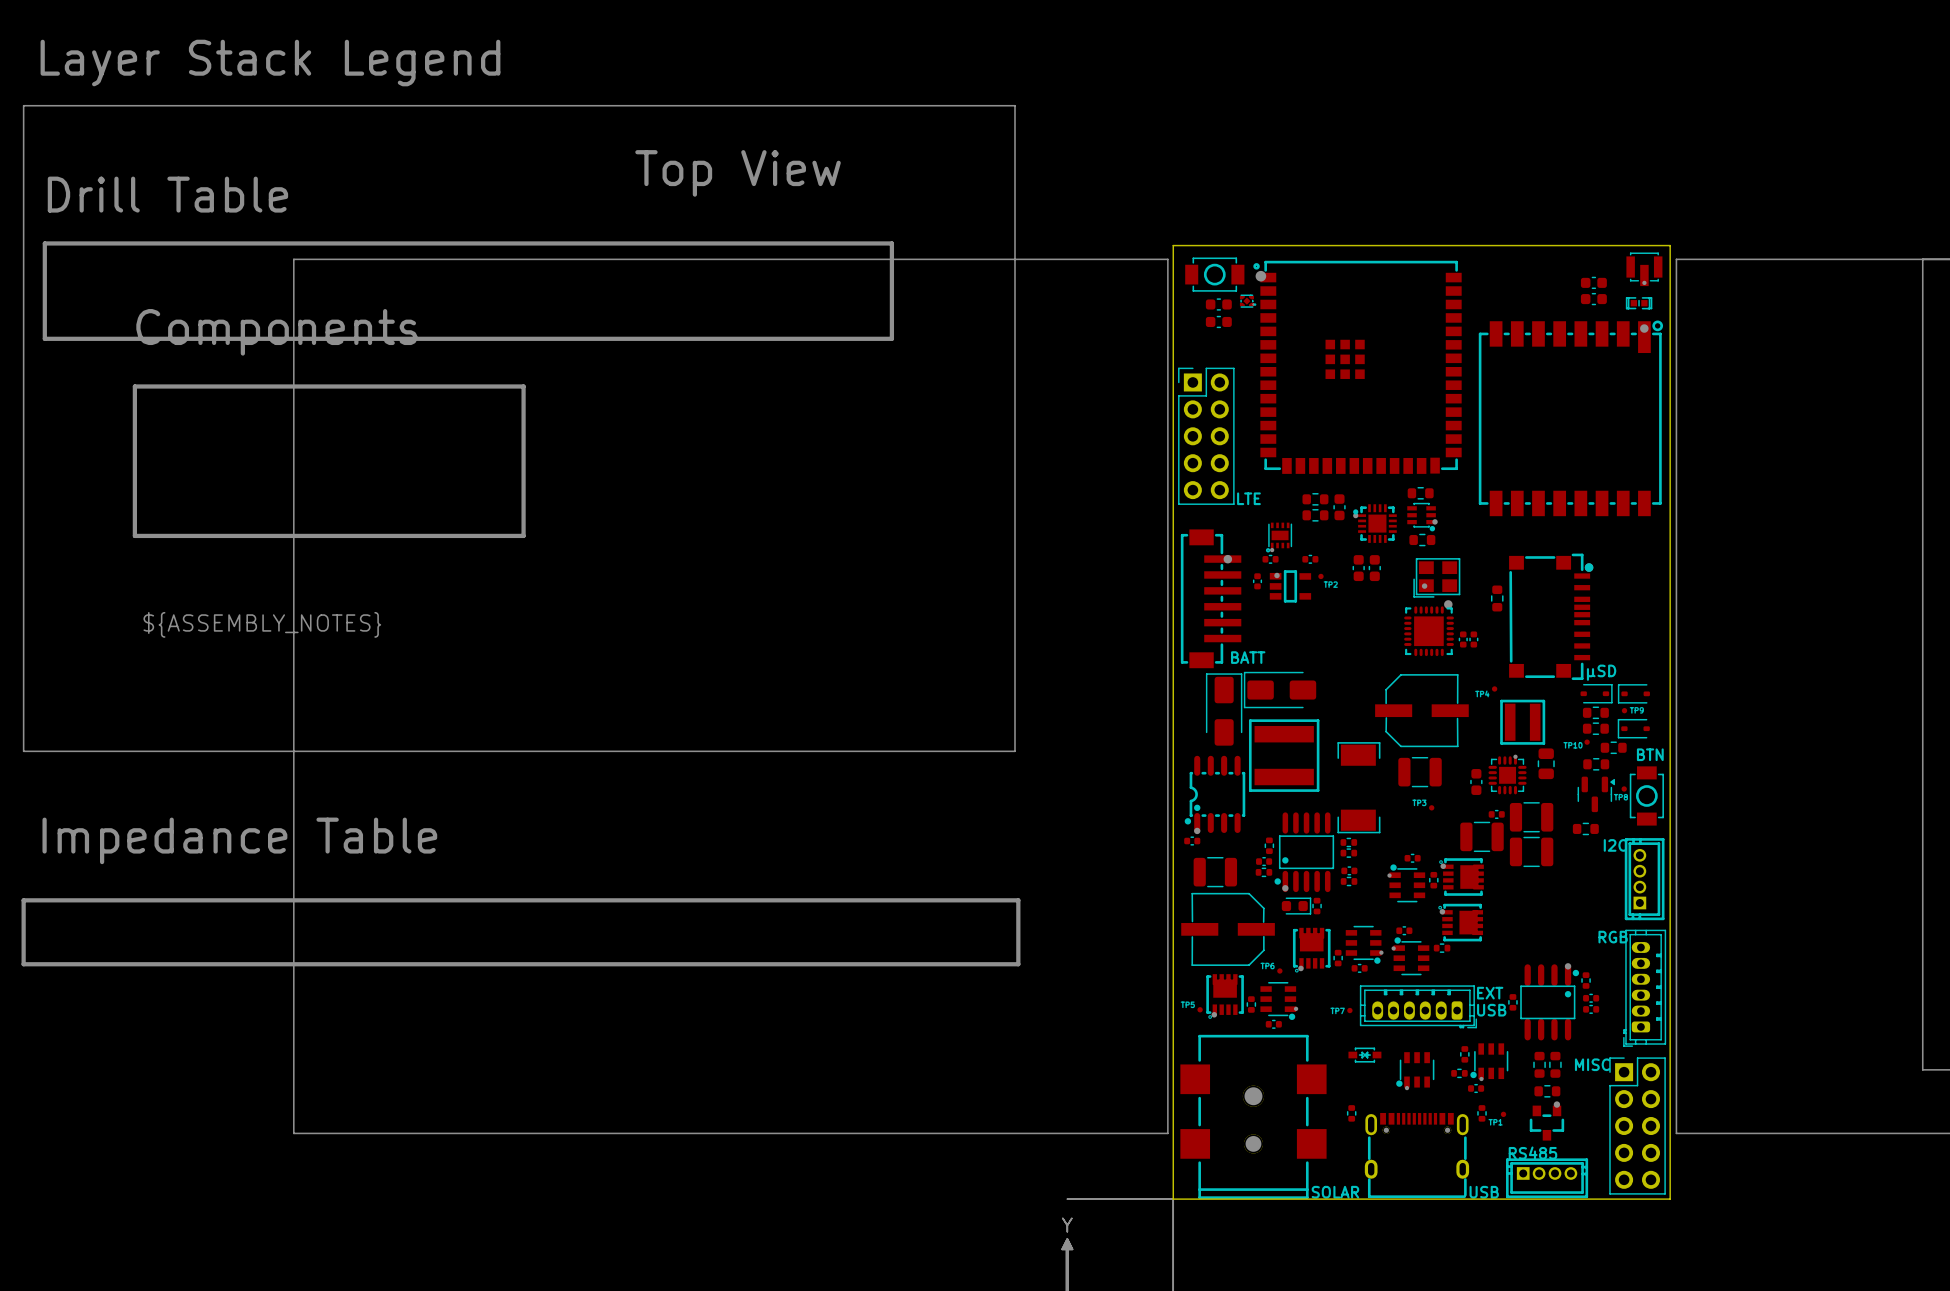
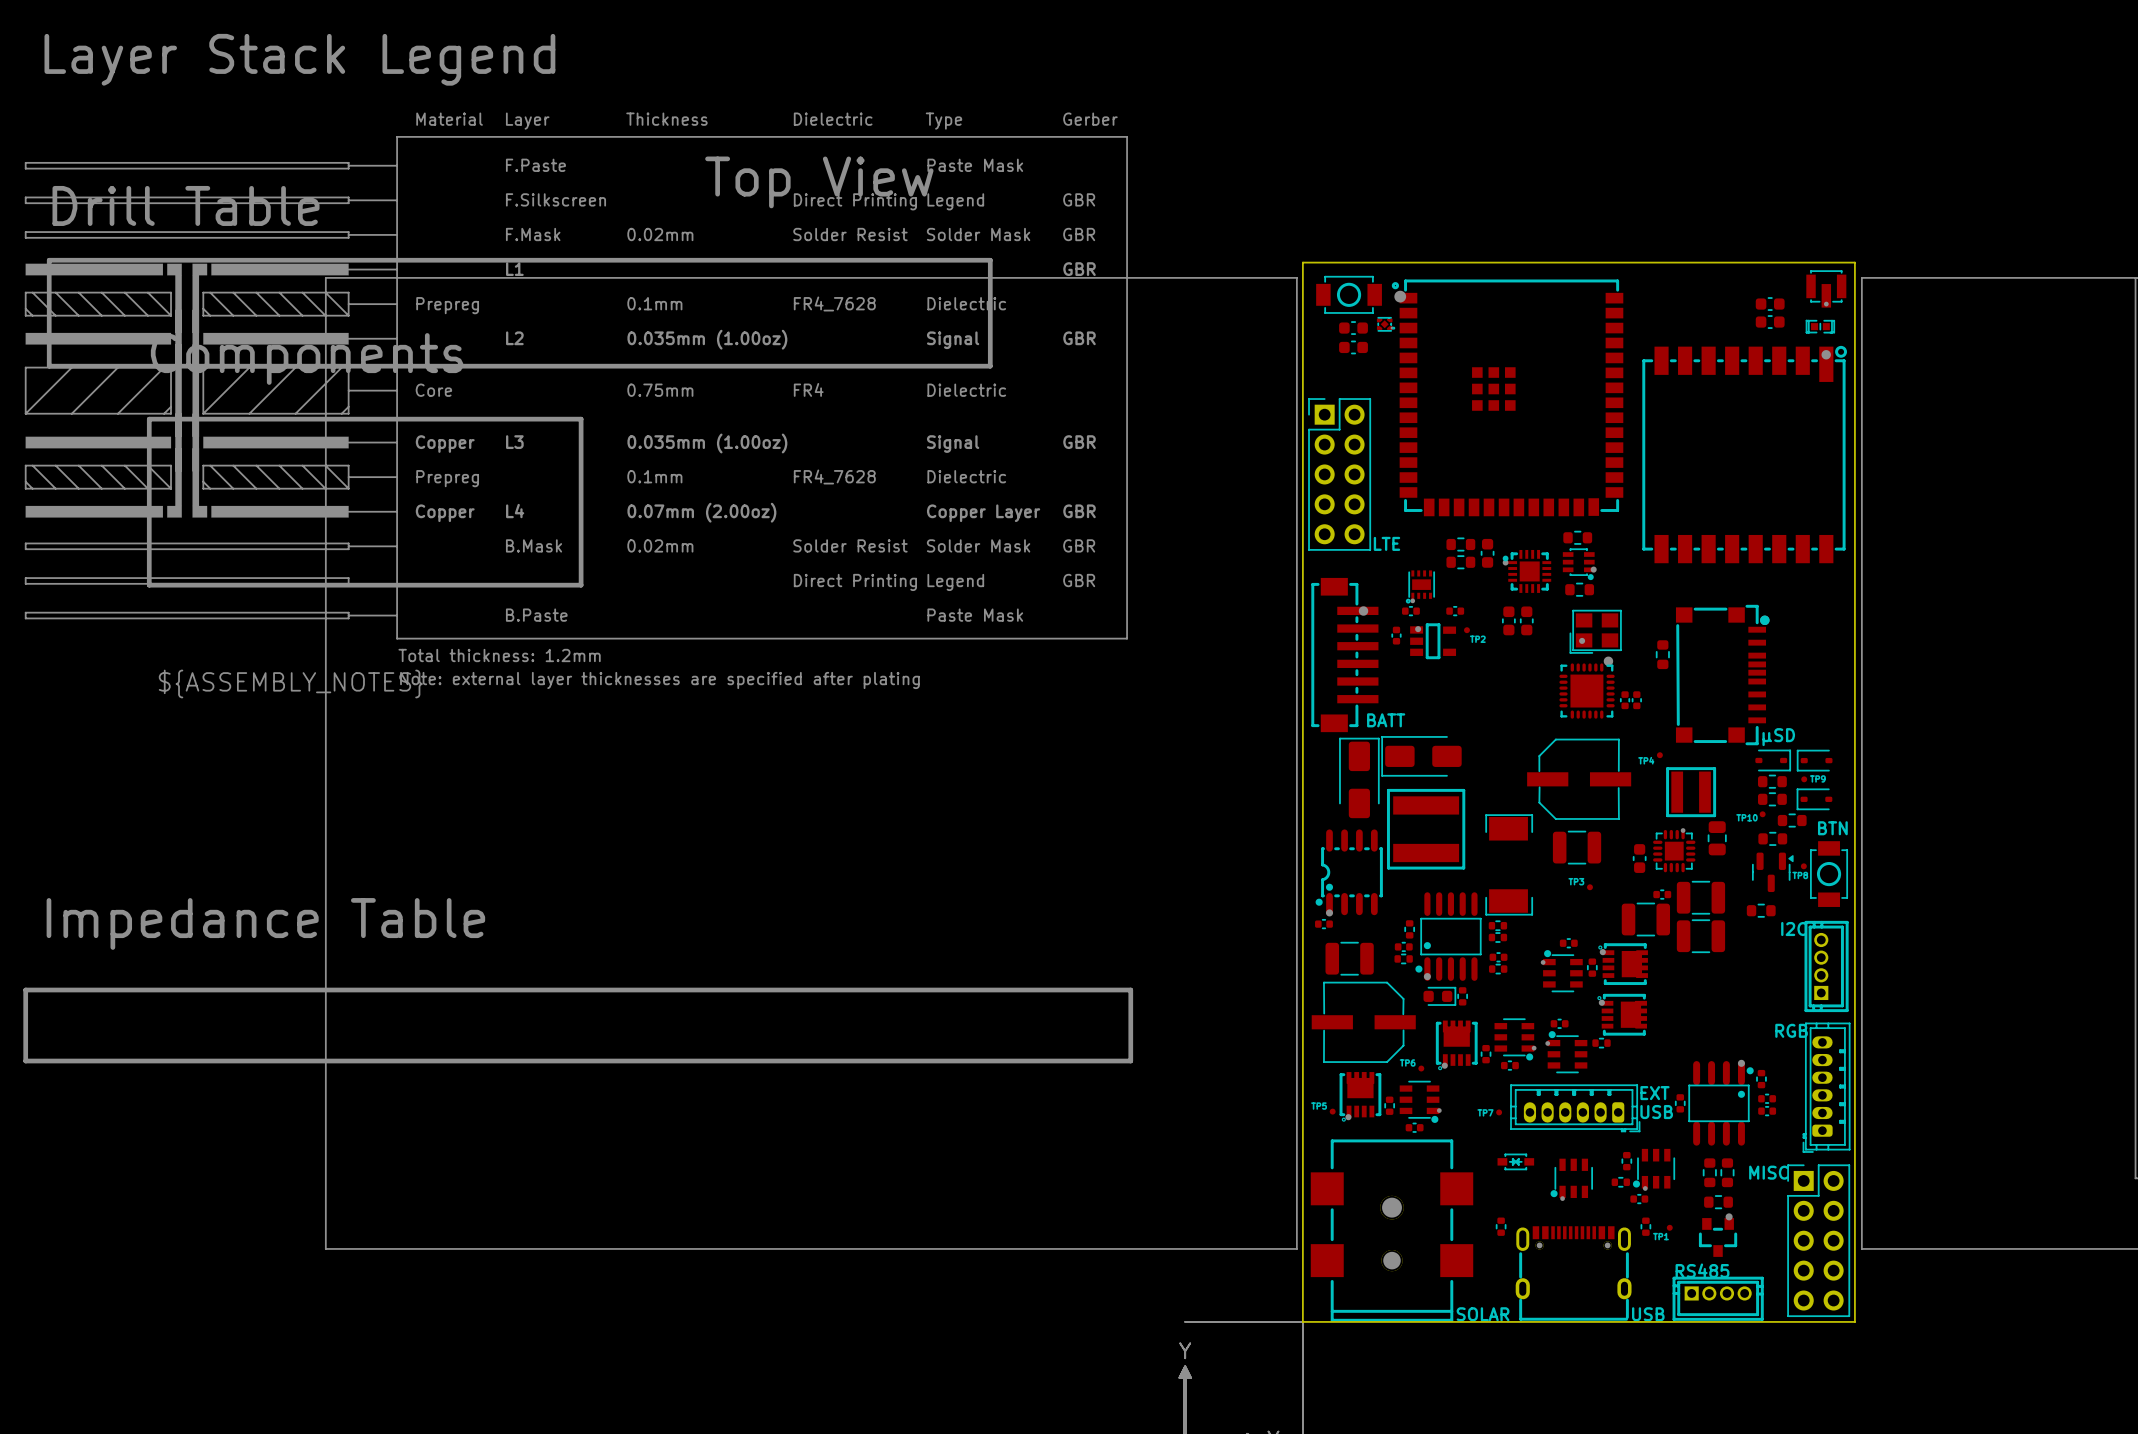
text: none -> Material (449, 119)
text: none -> Thickness (666, 119)
text: none -> Dielectric (833, 119)
text: none -> Gerber (1090, 119)
text: none -> Layer (527, 121)
text: none -> Type (943, 121)
line: (1014, 132) (1014, 105) (23, 105) (23, 155) -> (1127, 136) (397, 136) (397, 638) (1127, 638)
line: none -> (348, 165) (397, 165)
text: none -> F.Paste (535, 165)
text: none -> Paste Mask (975, 165)
line: (23, 160) (23, 186) -> (25, 168) (348, 168) (348, 162) (25, 162)
line: none -> (348, 200) (397, 200)
text: none -> F.Silkscreen (555, 199)
text: none -> GBR (1079, 199)
text: none -> Direct Printing (855, 201)
text: none -> Legend (955, 201)
line: (23, 192) (23, 218) -> (25, 203) (348, 203) (348, 197) (25, 197)
line: none -> (348, 234) (397, 234)
text: none -> F.Mask (533, 234)
text: none -> 0.02mm (660, 234)
text: none -> Solder Resist (850, 234)
text: none -> Solder Mask (978, 234)
text: none -> GBR (1079, 234)
line: (23, 223) (23, 272) -> (25, 237) (348, 237) (348, 232) (25, 232)
drawing: none -> [25, 263, 349, 518]
line: none -> (348, 269) (397, 269)
text: none -> L1 (514, 269)
text: none -> GBR (1079, 269)
line: none -> (25, 292) (171, 292) (171, 315)
line: none -> (32, 292) (55, 315)
line: none -> (55, 292) (78, 315)
line: none -> (78, 292) (101, 315)
line: none -> (101, 292) (124, 315)
line: none -> (124, 292) (147, 315)
line: none -> (147, 292) (171, 315)
line: none -> (210, 292) (233, 315)
line: none -> (233, 292) (256, 315)
line: none -> (256, 292) (279, 315)
line: none -> (279, 292) (302, 315)
line: none -> (302, 292) (325, 315)
line: none -> (325, 292) (348, 315)
line: none -> (348, 304) (397, 304)
text: none -> 0.1mm (654, 303)
text: none -> FR4_7628 (834, 303)
text: none -> Dielectric (966, 303)
text: none -> Prepreg (447, 305)
line: none -> (25, 308) (32, 315)
line: none -> (203, 308) (210, 315)
line: (23, 293) (23, 340) -> (71, 367) (25, 413) (171, 413) (171, 367) (25, 367)
line: none -> (25, 315) (171, 315)
line: none -> (348, 315) (348, 292) (203, 292) (203, 315) (348, 315)
text: none -> L2 (514, 338)
text: none -> GBR (1079, 338)
line: none -> (348, 338) (397, 338)
text: none -> 0.035mm (1.00oz) (707, 339)
text: none -> Signal (953, 340)
line: none -> (117, 367) (71, 413)
line: none -> (164, 367) (117, 413)
line: none -> (249, 367) (203, 413)
line: none -> (295, 367) (249, 413)
line: none -> (341, 367) (295, 413)
line: none -> (348, 390) (397, 390)
text: none -> Core (433, 390)
text: none -> 0.75mm (660, 390)
text: none -> FR4 (808, 389)
text: none -> Dielectric (966, 390)
line: none -> (171, 406) (164, 413)
line: none -> (348, 406) (341, 413)
line: (23, 381) (23, 428) -> (171, 488) (171, 465) (25, 465)
line: none -> (203, 413) (203, 367) (348, 367) (348, 413) (203, 413)
line: none -> (348, 442) (397, 442)
text: none -> L3 (514, 442)
text: none -> GBR (1079, 442)
text: none -> Copper (445, 444)
text: none -> 0.035mm (1.00oz) (707, 443)
text: none -> Signal (953, 444)
line: none -> (32, 465) (55, 488)
line: none -> (55, 465) (78, 488)
line: none -> (78, 465) (101, 488)
line: none -> (101, 465) (124, 488)
line: none -> (124, 465) (147, 488)
line: none -> (147, 465) (171, 488)
line: none -> (210, 465) (233, 488)
line: none -> (233, 465) (256, 488)
line: none -> (256, 465) (279, 488)
line: none -> (279, 465) (302, 488)
line: none -> (302, 465) (325, 488)
line: none -> (325, 465) (348, 488)
line: none -> (348, 477) (397, 477)
text: none -> 0.1mm (654, 476)
text: none -> FR4_7628 (834, 476)
text: none -> Dielectric (966, 476)
text: none -> Prepreg (447, 478)
line: none -> (25, 481) (32, 488)
line: none -> (203, 481) (210, 488)
line: (23, 449) (23, 498) -> (25, 488) (171, 488)
line: none -> (348, 488) (348, 465) (203, 465) (203, 488) (348, 488)
line: none -> (348, 511) (397, 511)
text: none -> L4 (515, 511)
text: none -> GBR (1079, 511)
text: none -> 0.07mm (2.00oz) (701, 512)
text: none -> Copper (445, 513)
text: none -> Copper Layer (983, 513)
line: none -> (348, 546) (397, 546)
text: none -> B.Mask (534, 545)
text: none -> 0.02mm (660, 545)
text: none -> Solder Resist (850, 545)
text: none -> Solder Mask (978, 545)
text: none -> GBR (1079, 545)
line: (23, 503) (23, 529) -> (25, 549) (348, 549) (348, 543) (25, 543)
text: none -> GBR (1079, 580)
text: none -> Direct Printing (855, 582)
text: none -> Legend (955, 582)
line: (23, 534) (23, 560) -> (25, 583) (348, 583) (348, 578) (25, 578)
text: none -> B.Paste (536, 615)
text: none -> Paste Mask (975, 615)
line: none -> (348, 615) (397, 615)
line: (23, 565) (23, 751) (1014, 751) (1014, 584) -> (25, 618) (348, 618) (348, 612) (25, 612)
text: none -> Total thickness: 1.2mm (499, 655)
text: none -> Note: external layer thicknesses are specified after plating (659, 680)

